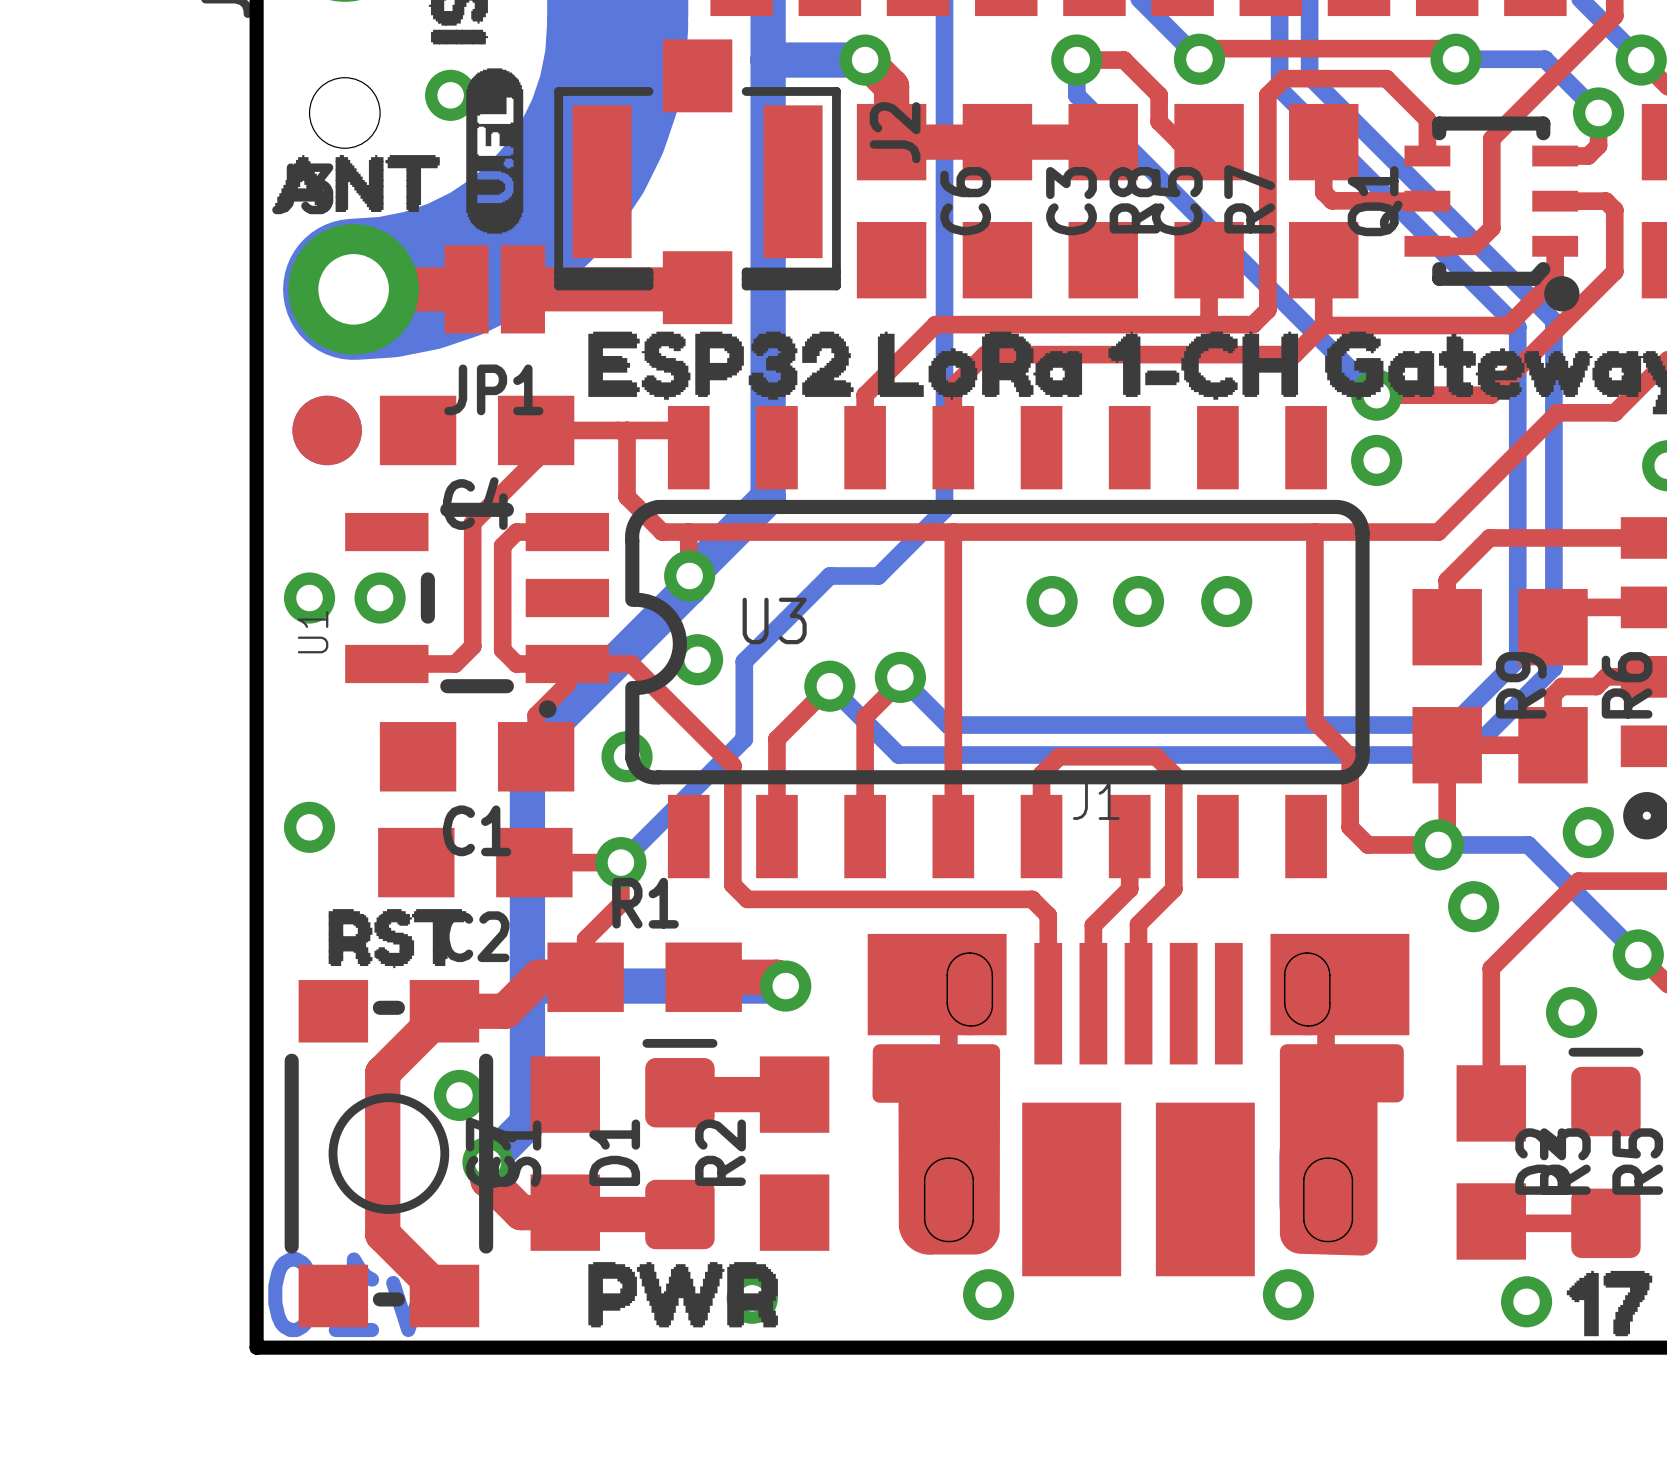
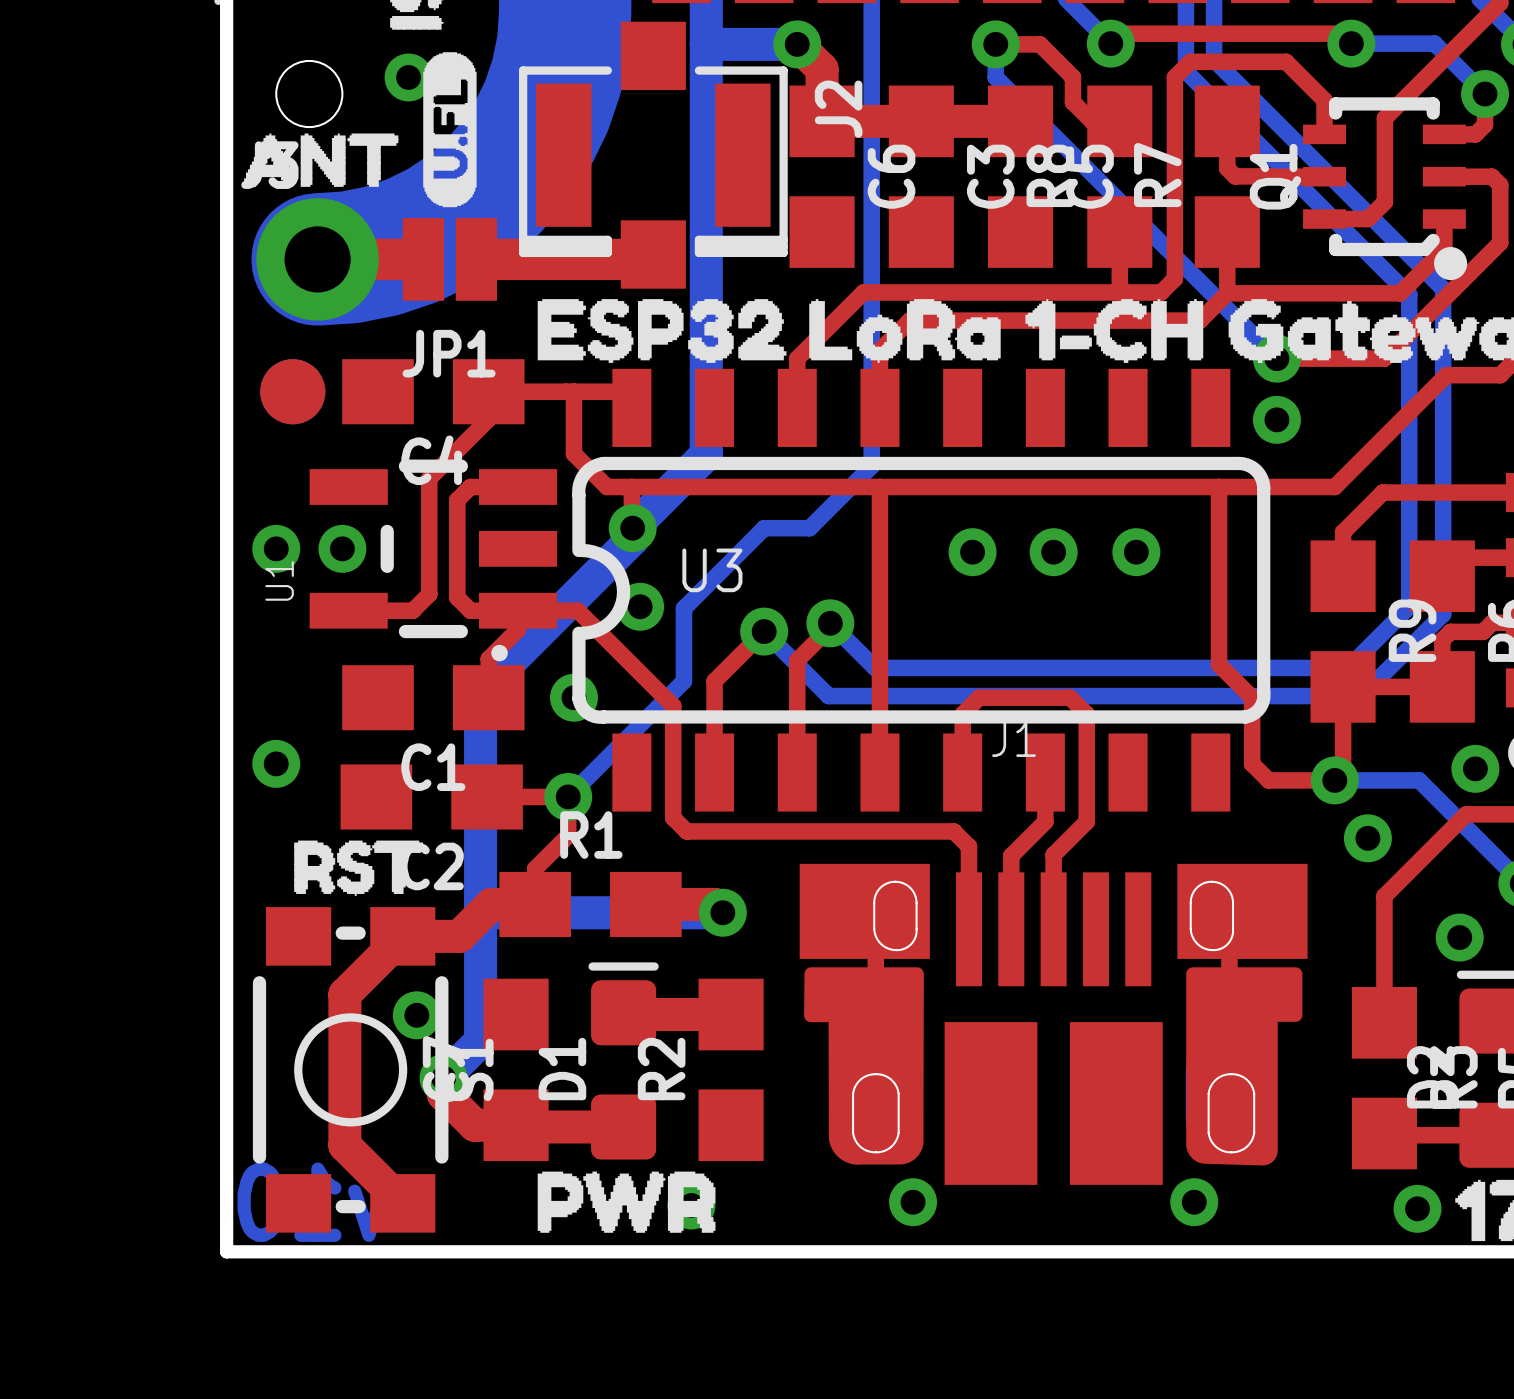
J2 position: (697, 181) -> (653, 155)

